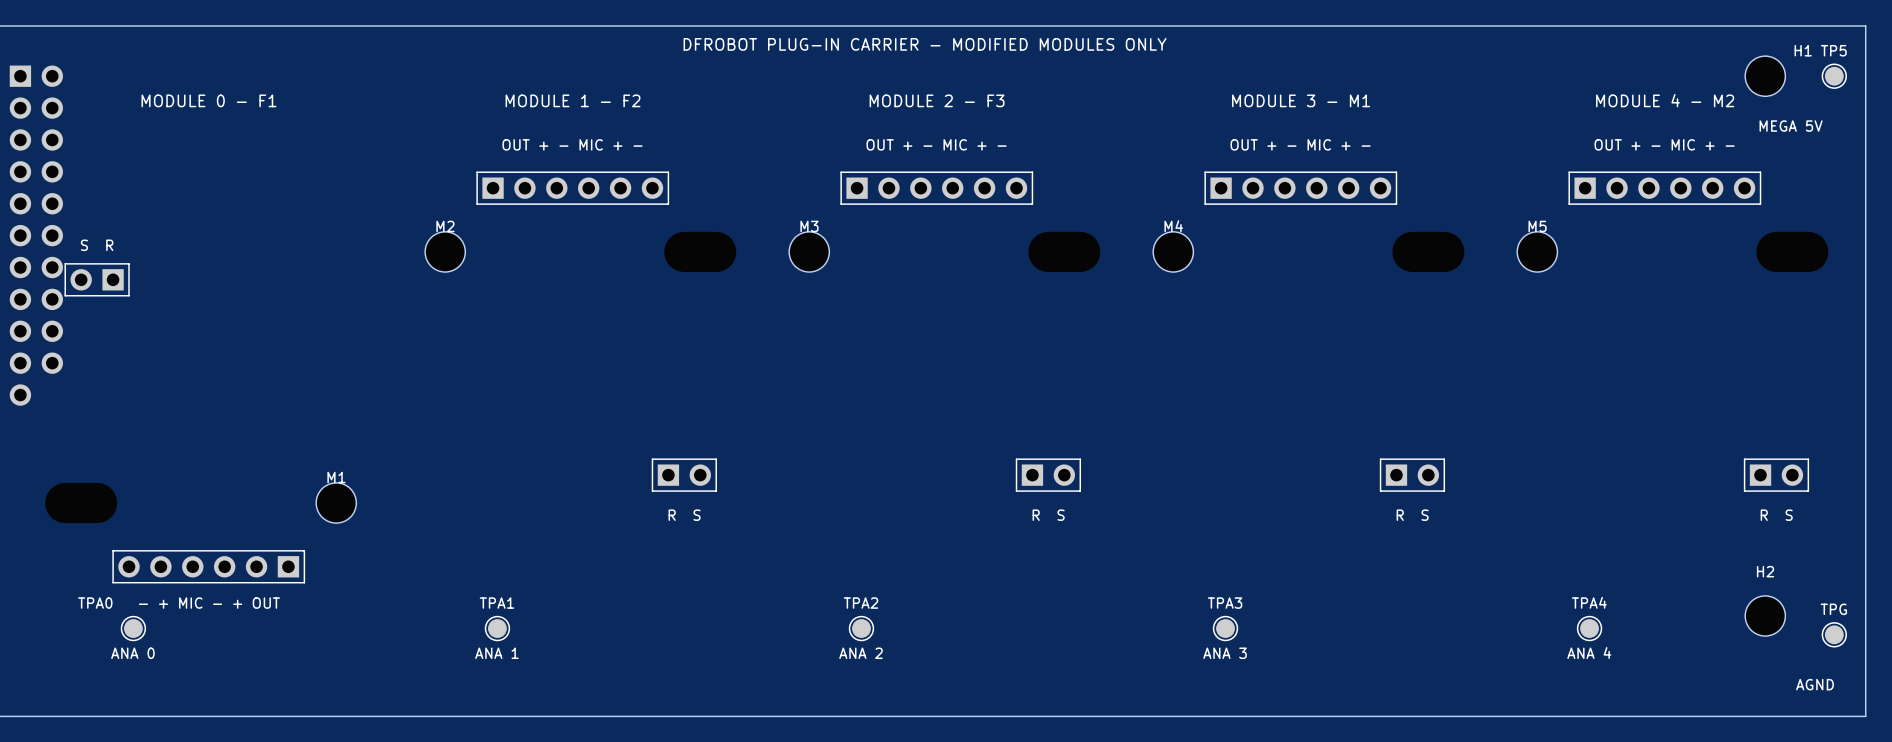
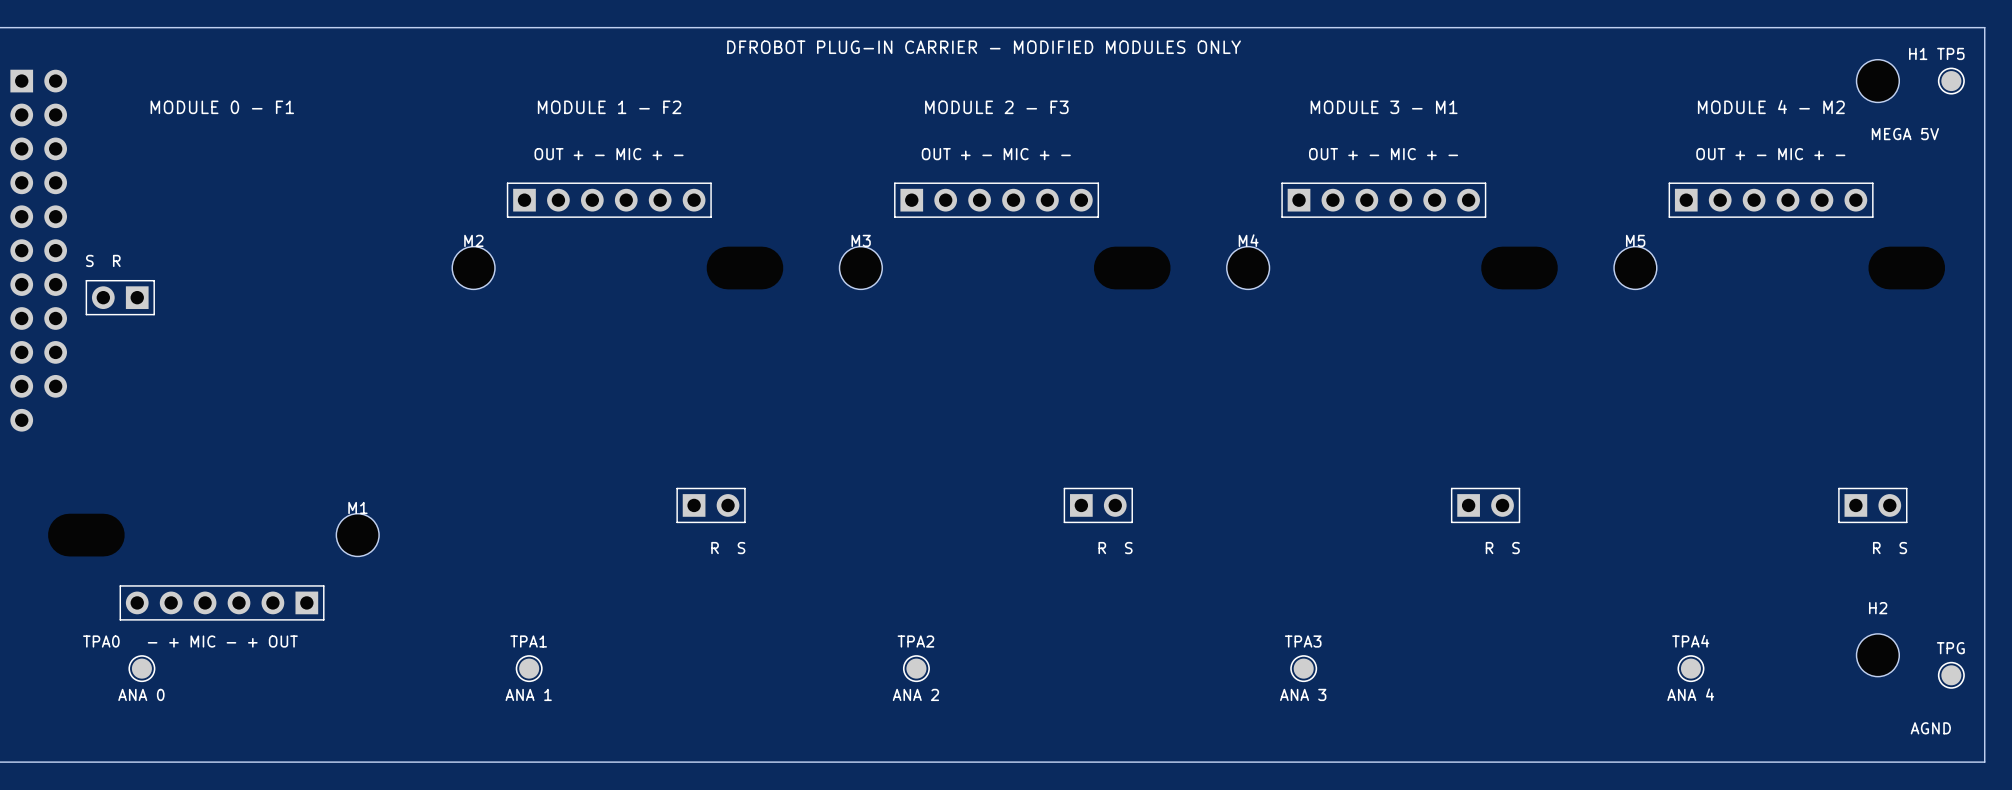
M2 footprint: [425, 171, 737, 492] -> [452, 182, 784, 524]
M3 footprint: [789, 171, 1101, 492] -> [839, 182, 1171, 524]
M4 footprint: [1153, 171, 1465, 492] -> [1226, 182, 1558, 524]
M5 footprint: [1517, 171, 1829, 492] -> [1614, 182, 1946, 524]
M1 footprint: [45, 263, 357, 584] -> [48, 280, 380, 621]

